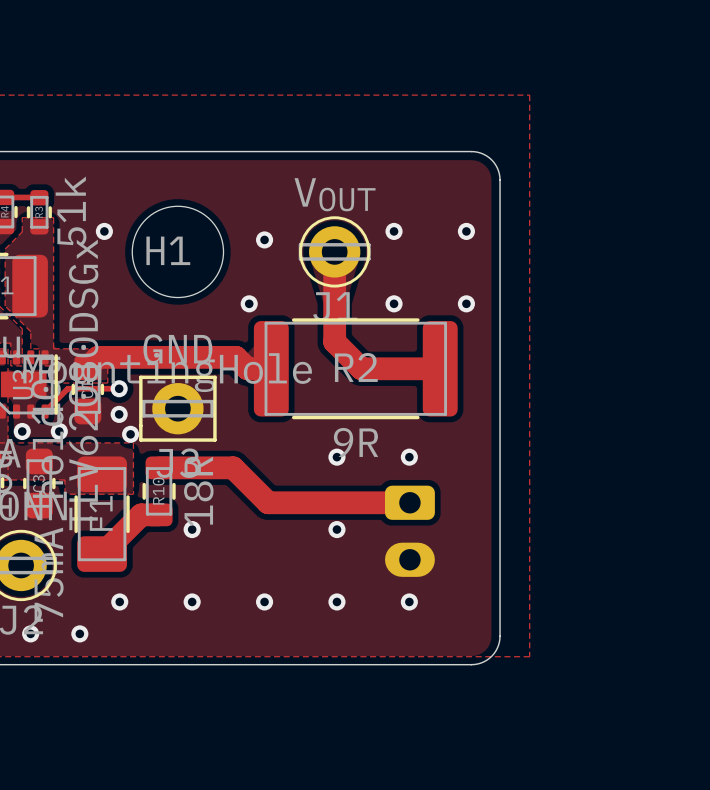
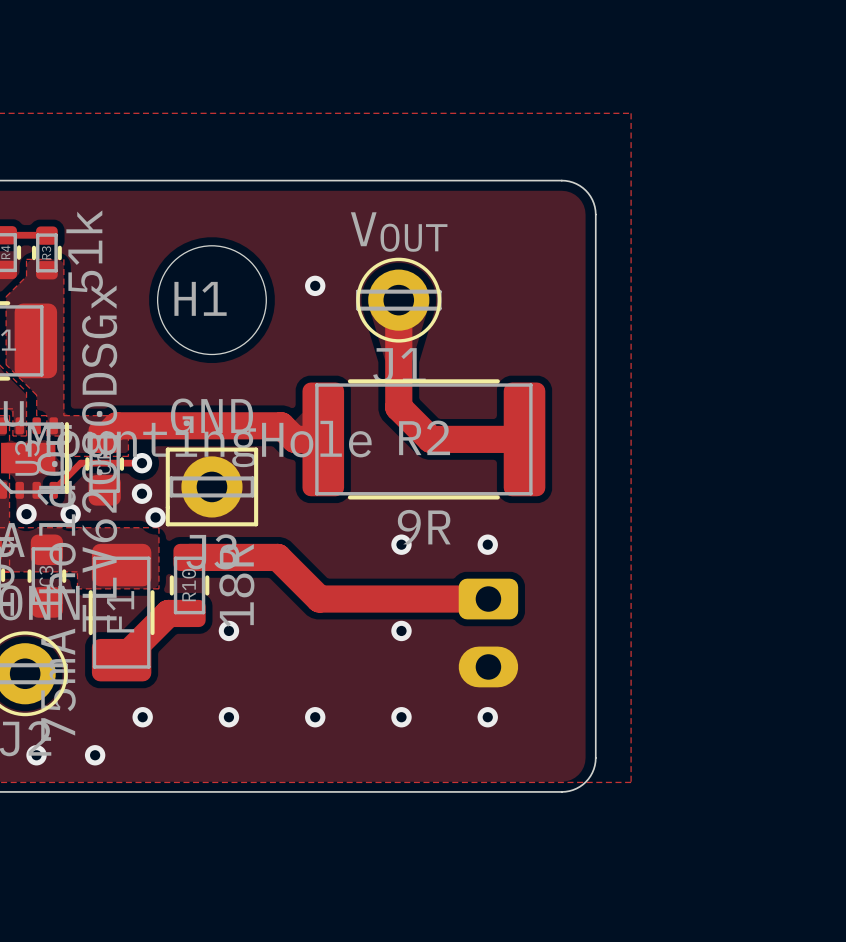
via: (104, 231) -> none
via: (394, 231) -> none
via: (466, 231) -> none
via: (249, 303) -> none
via: (394, 303) -> none
via: (466, 303) -> none

